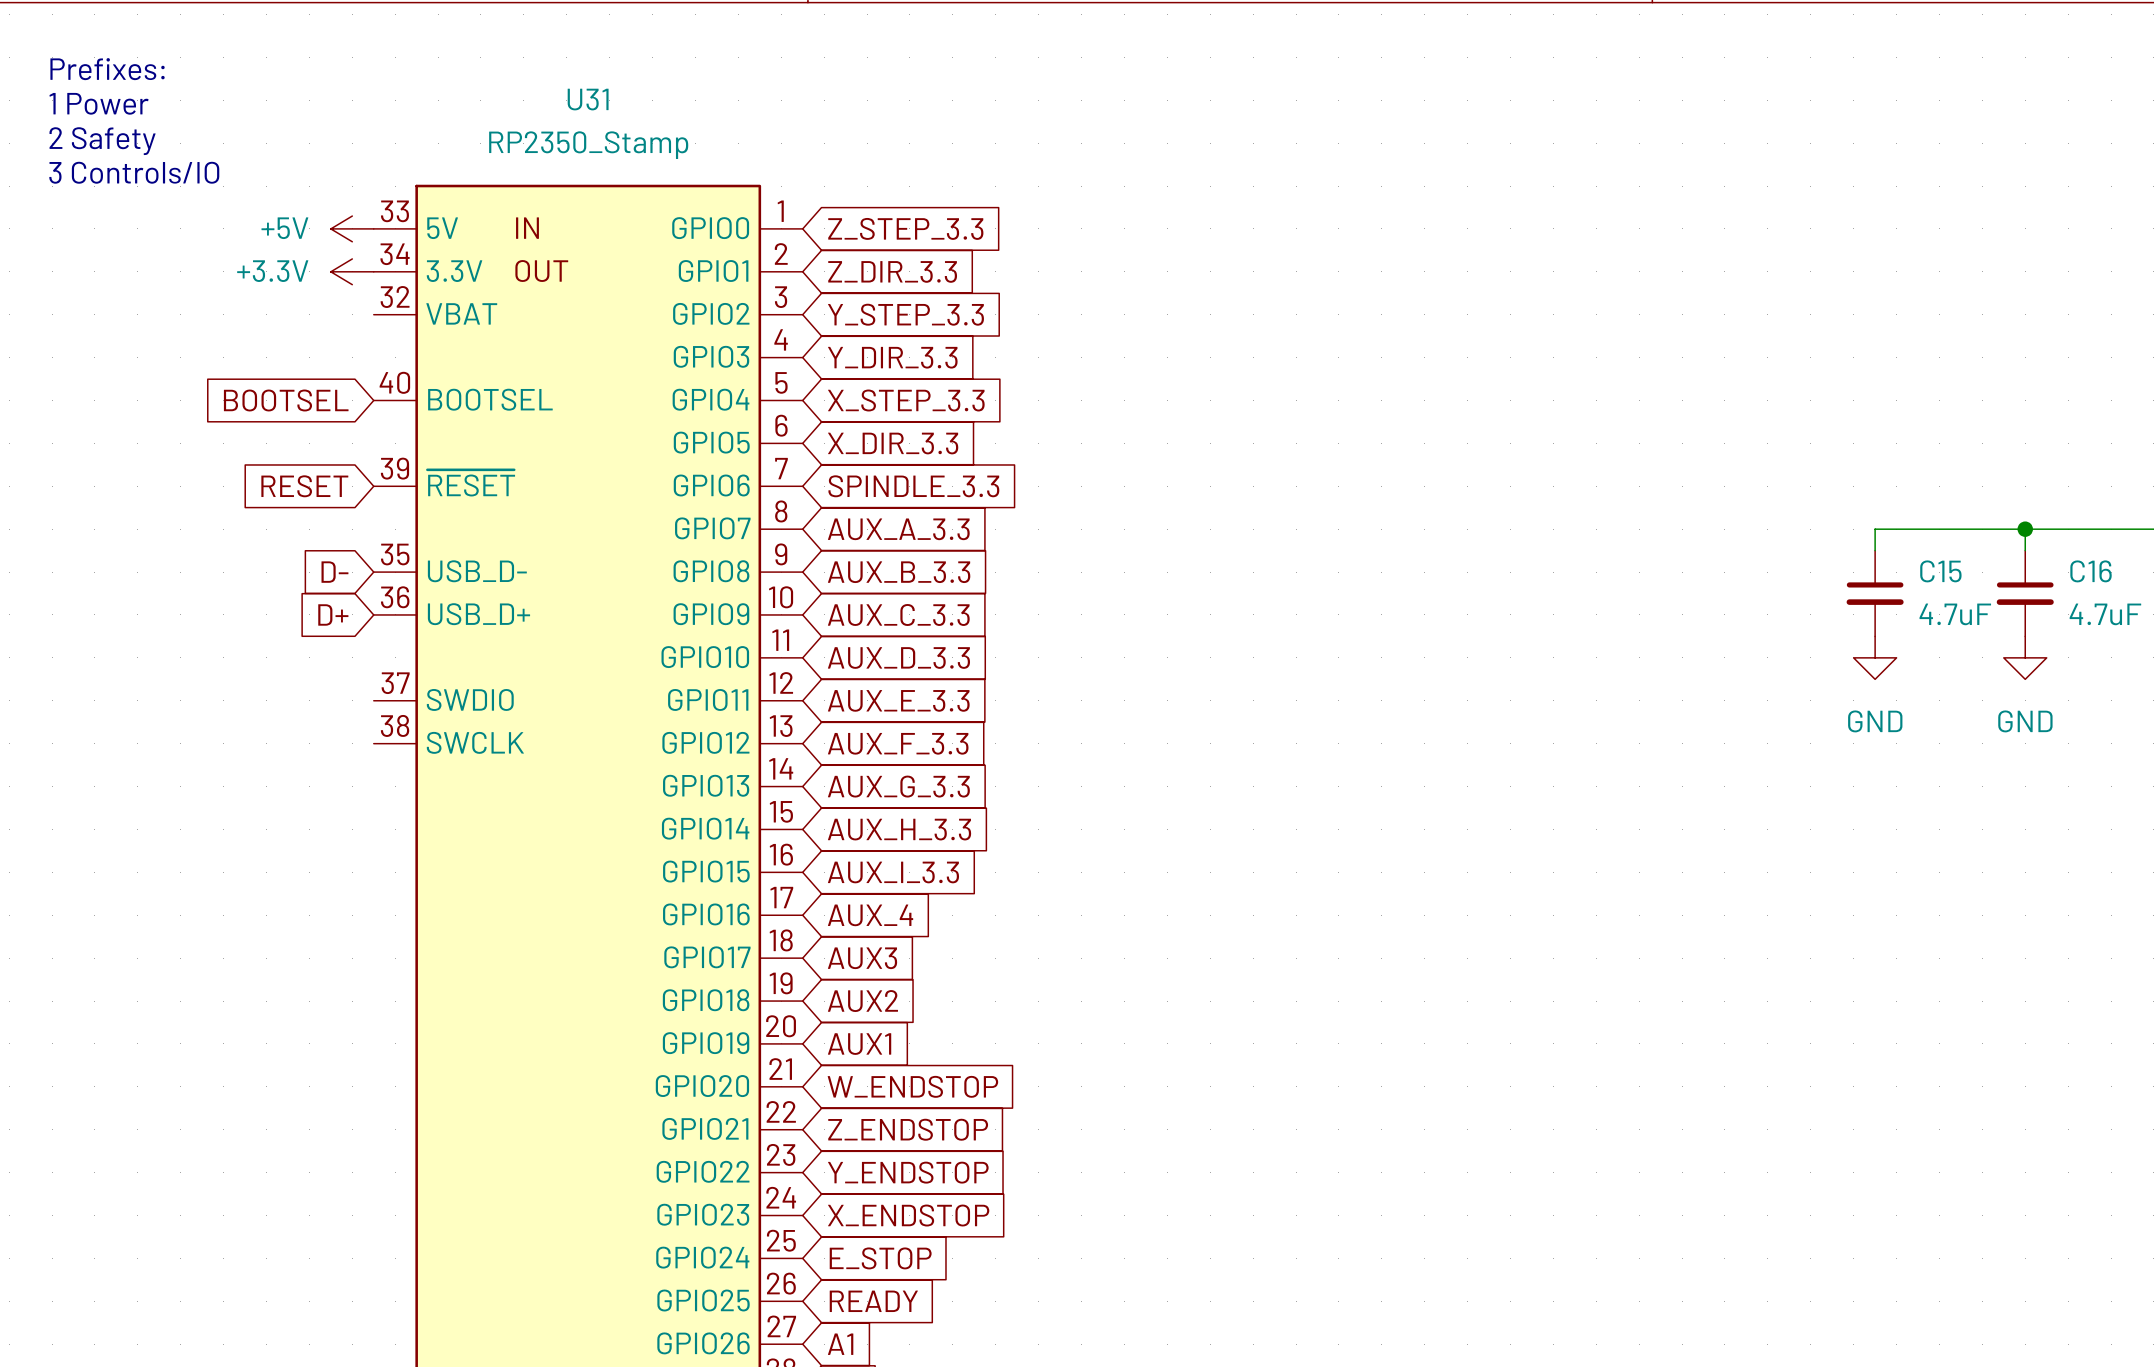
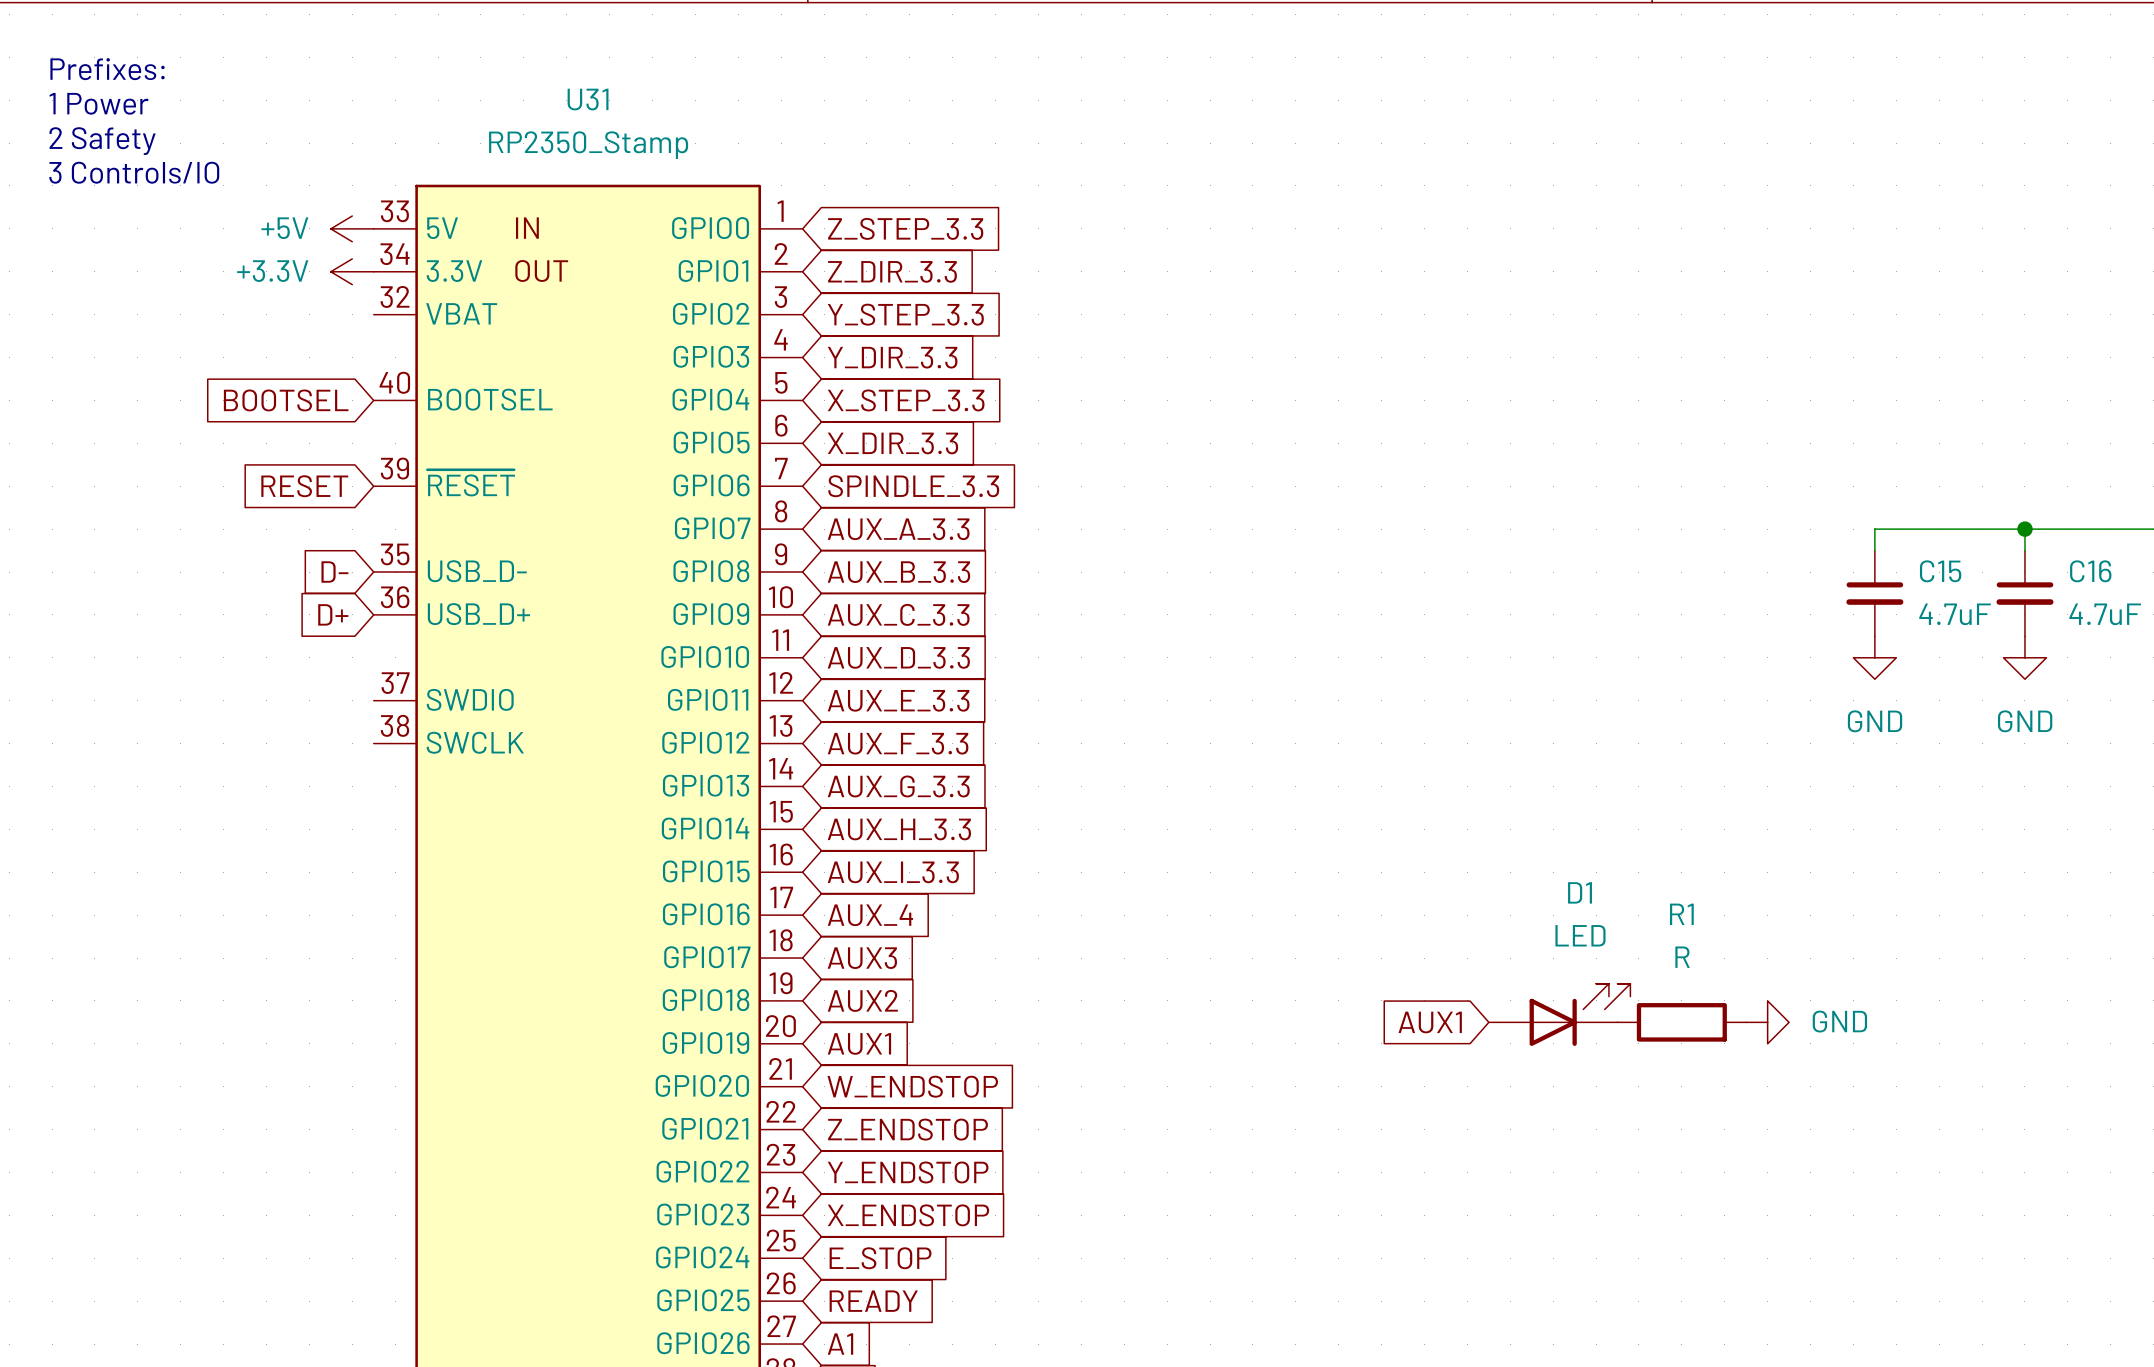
D1: none -> LED (1559, 1014)
global label: none -> AUX1 (1430, 1022)
R1: none -> R (1681, 1022)
power symbol: none -> GND (1767, 1022)

